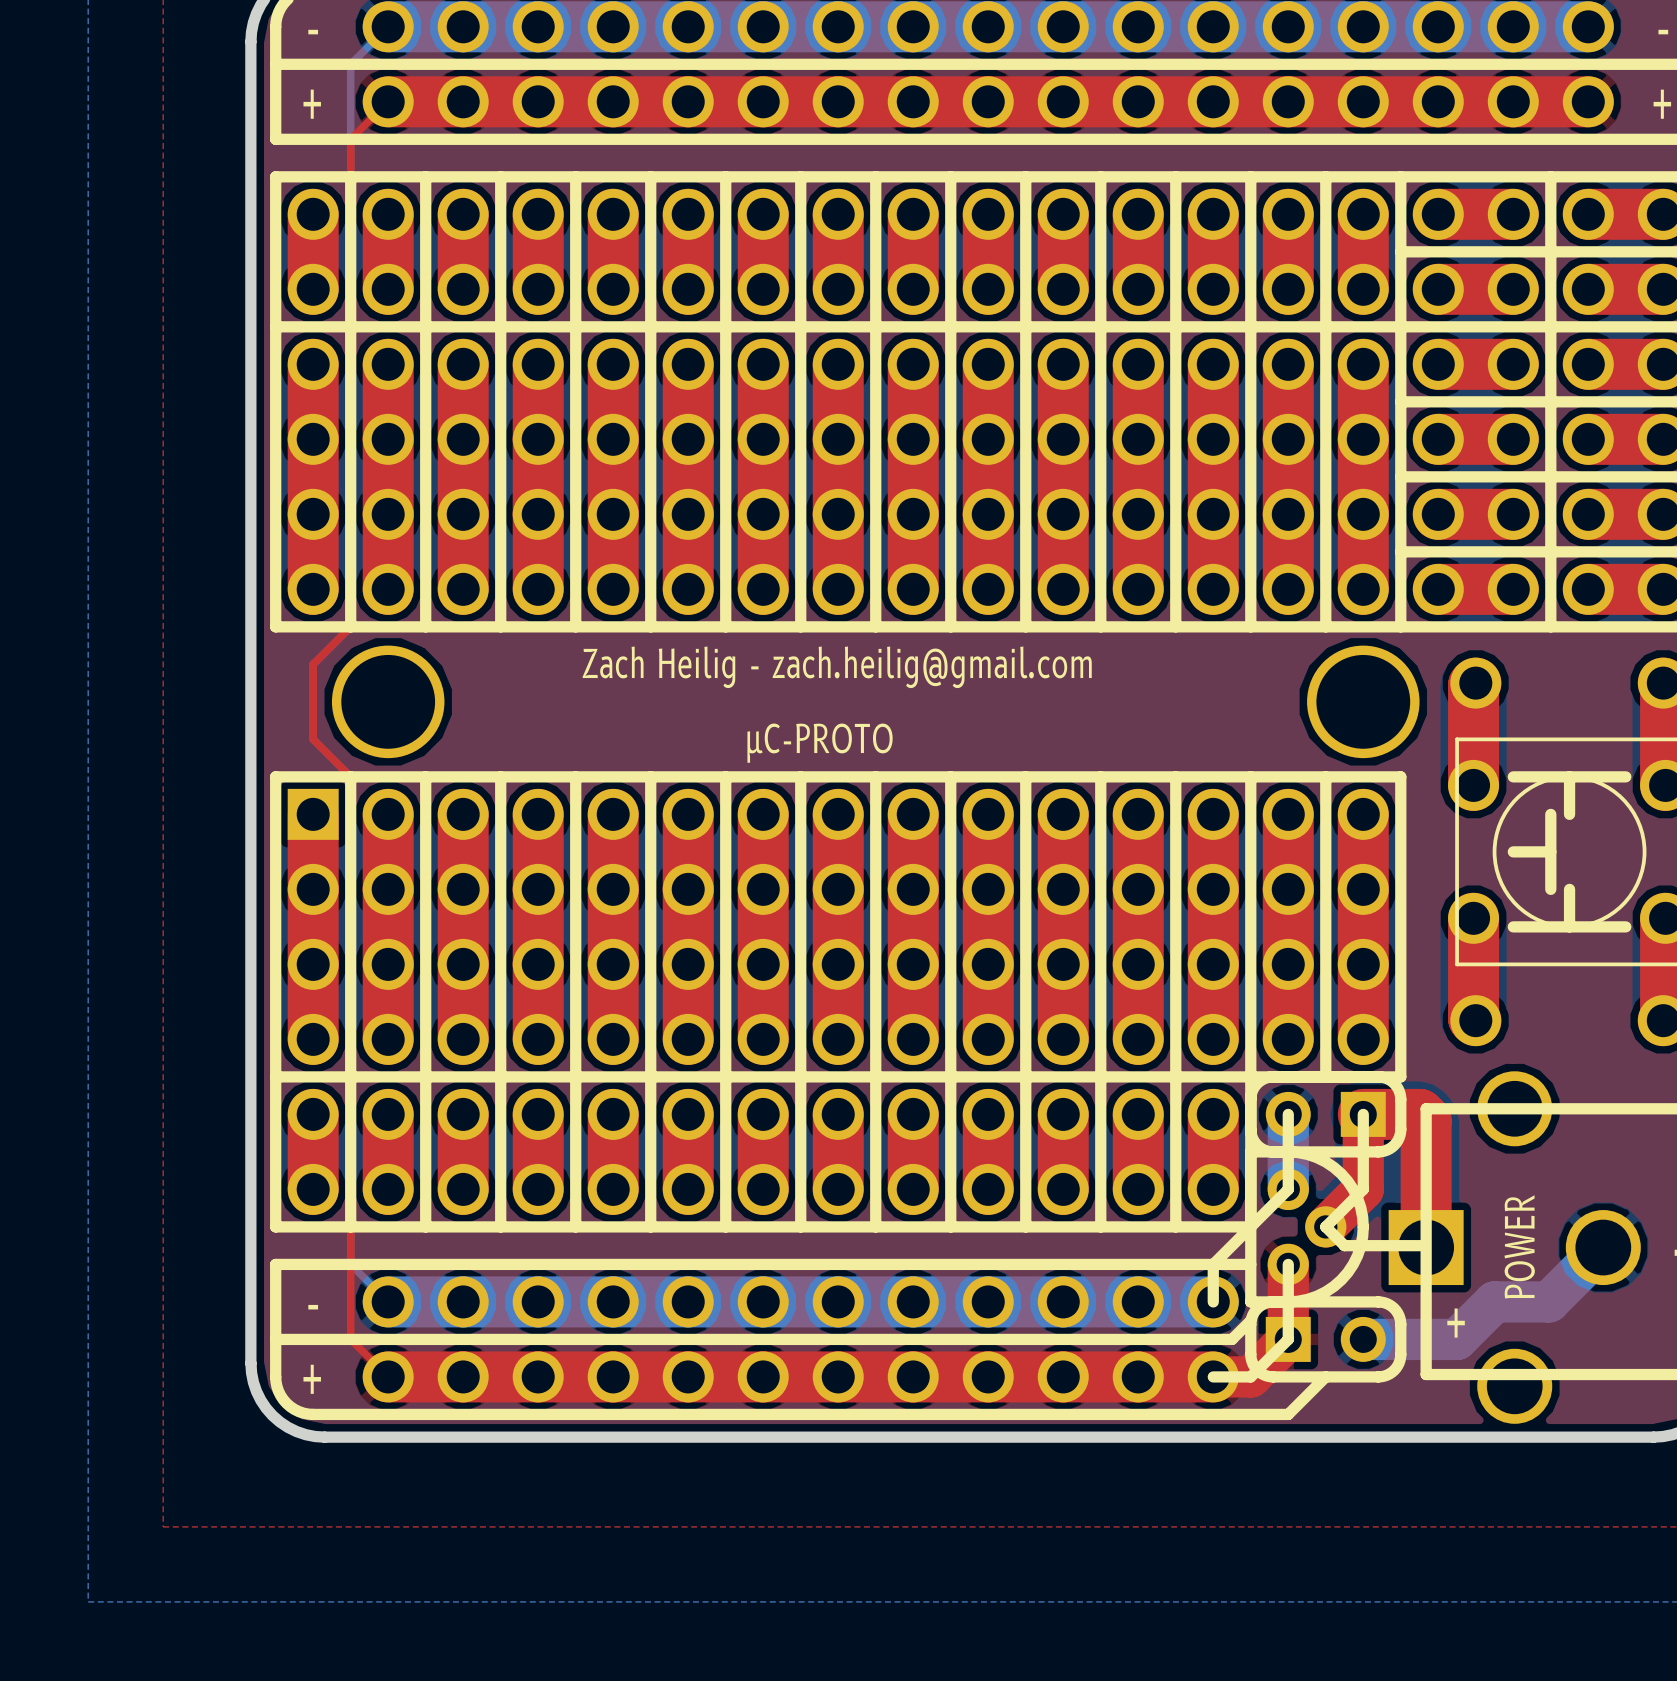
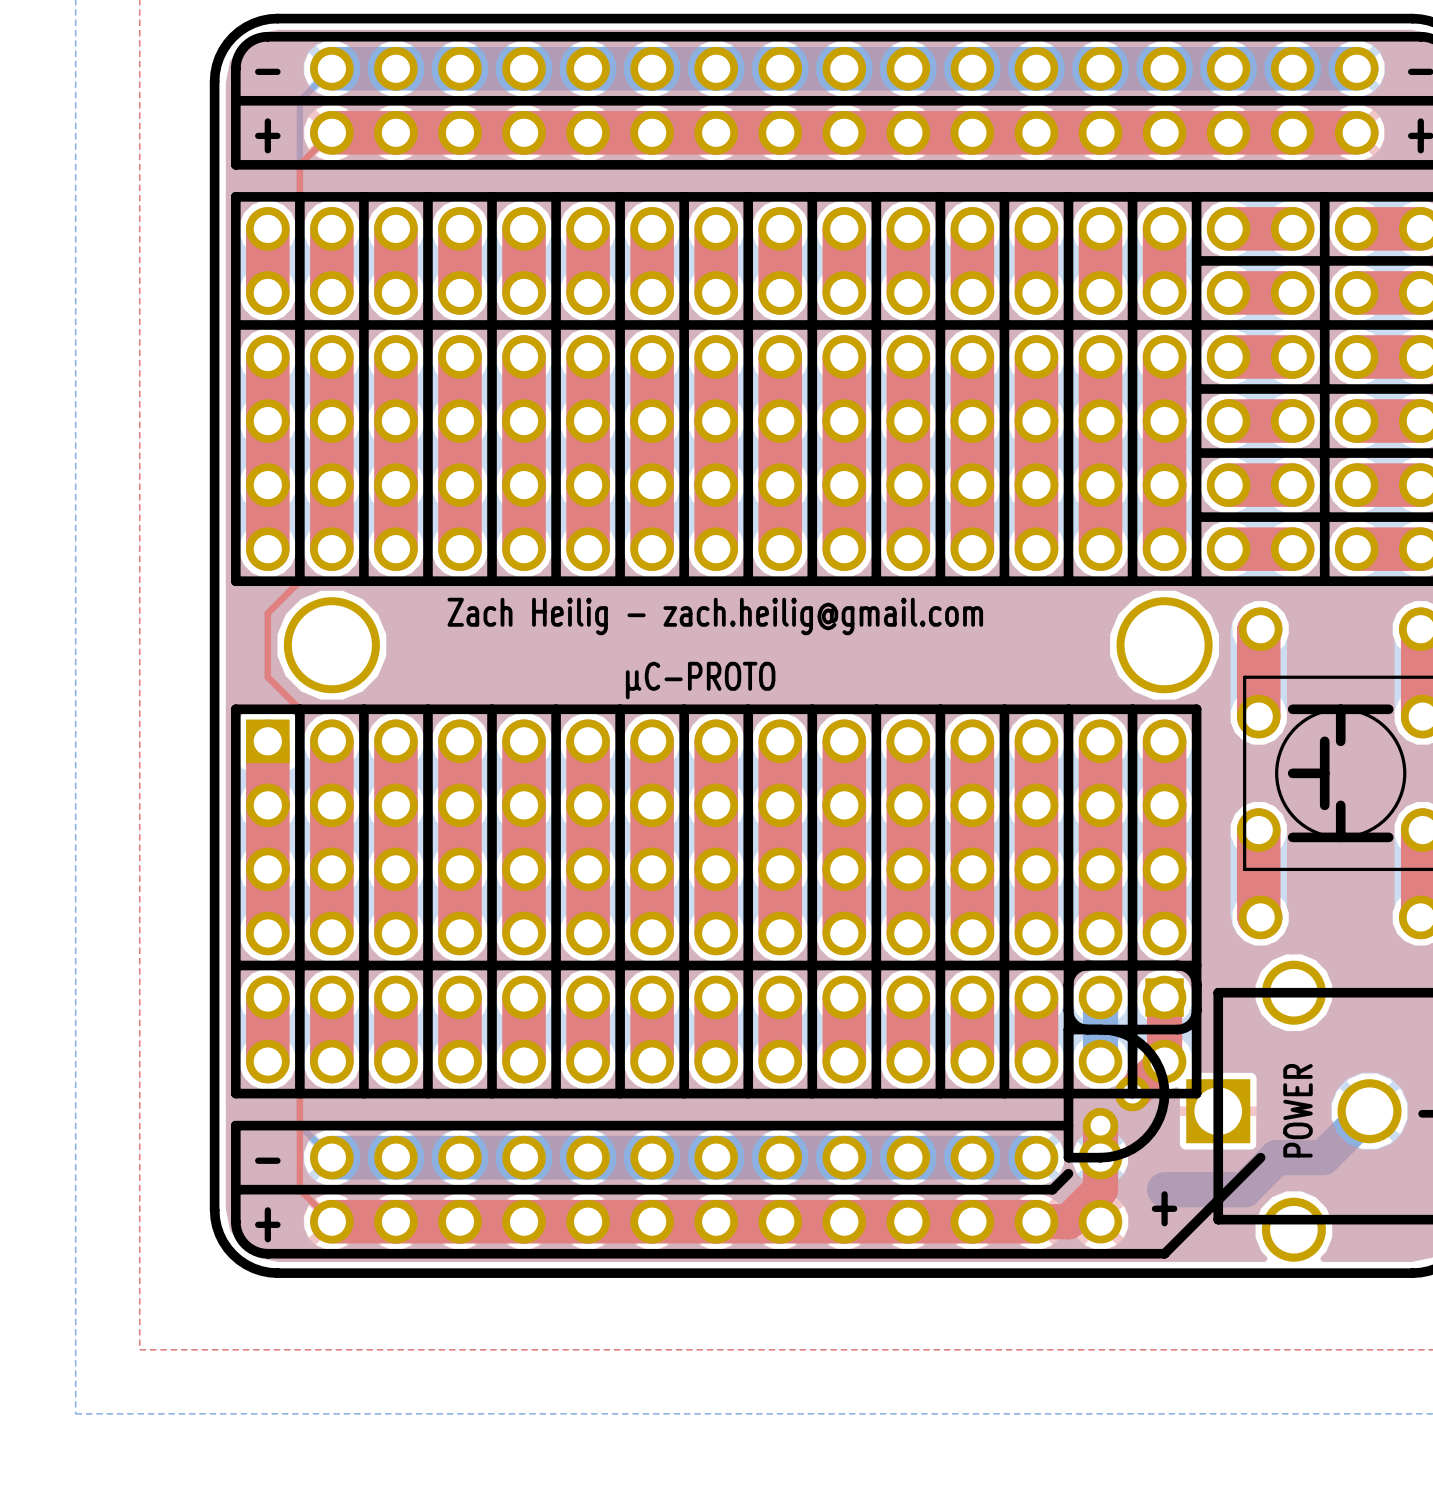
line: none -> (1132, 965) (1132, 1093)
line: none -> (1196, 965) (1196, 1093) (1068, 1093)
part: none -> (940, 997)
line: (1288, 1114) (1288, 1189) (1213, 1264) (1213, 1301) -> none
line: (1363, 1114) (1363, 1189) (1325, 1226) (1344, 1245) (1419, 1245) -> none
top track: (1363, 1114) (1419, 1114) (1426, 1121) (1426, 1247) -> none
part: none -> (940, 1061)
line: (1288, 1264) (1288, 1339) (1250, 1376) (1213, 1376) -> none
part: (800, 1301) -> none
part: none -> (716, 1157)
text position: + (1456, 1323) -> + (1164, 1208)
part: (1325, 1339) -> none
part: (800, 1376) -> none
part: none -> (716, 1221)
line: (1325, 1376) (1288, 1414) -> (1260, 1157) (1164, 1253) (1100, 1253)

